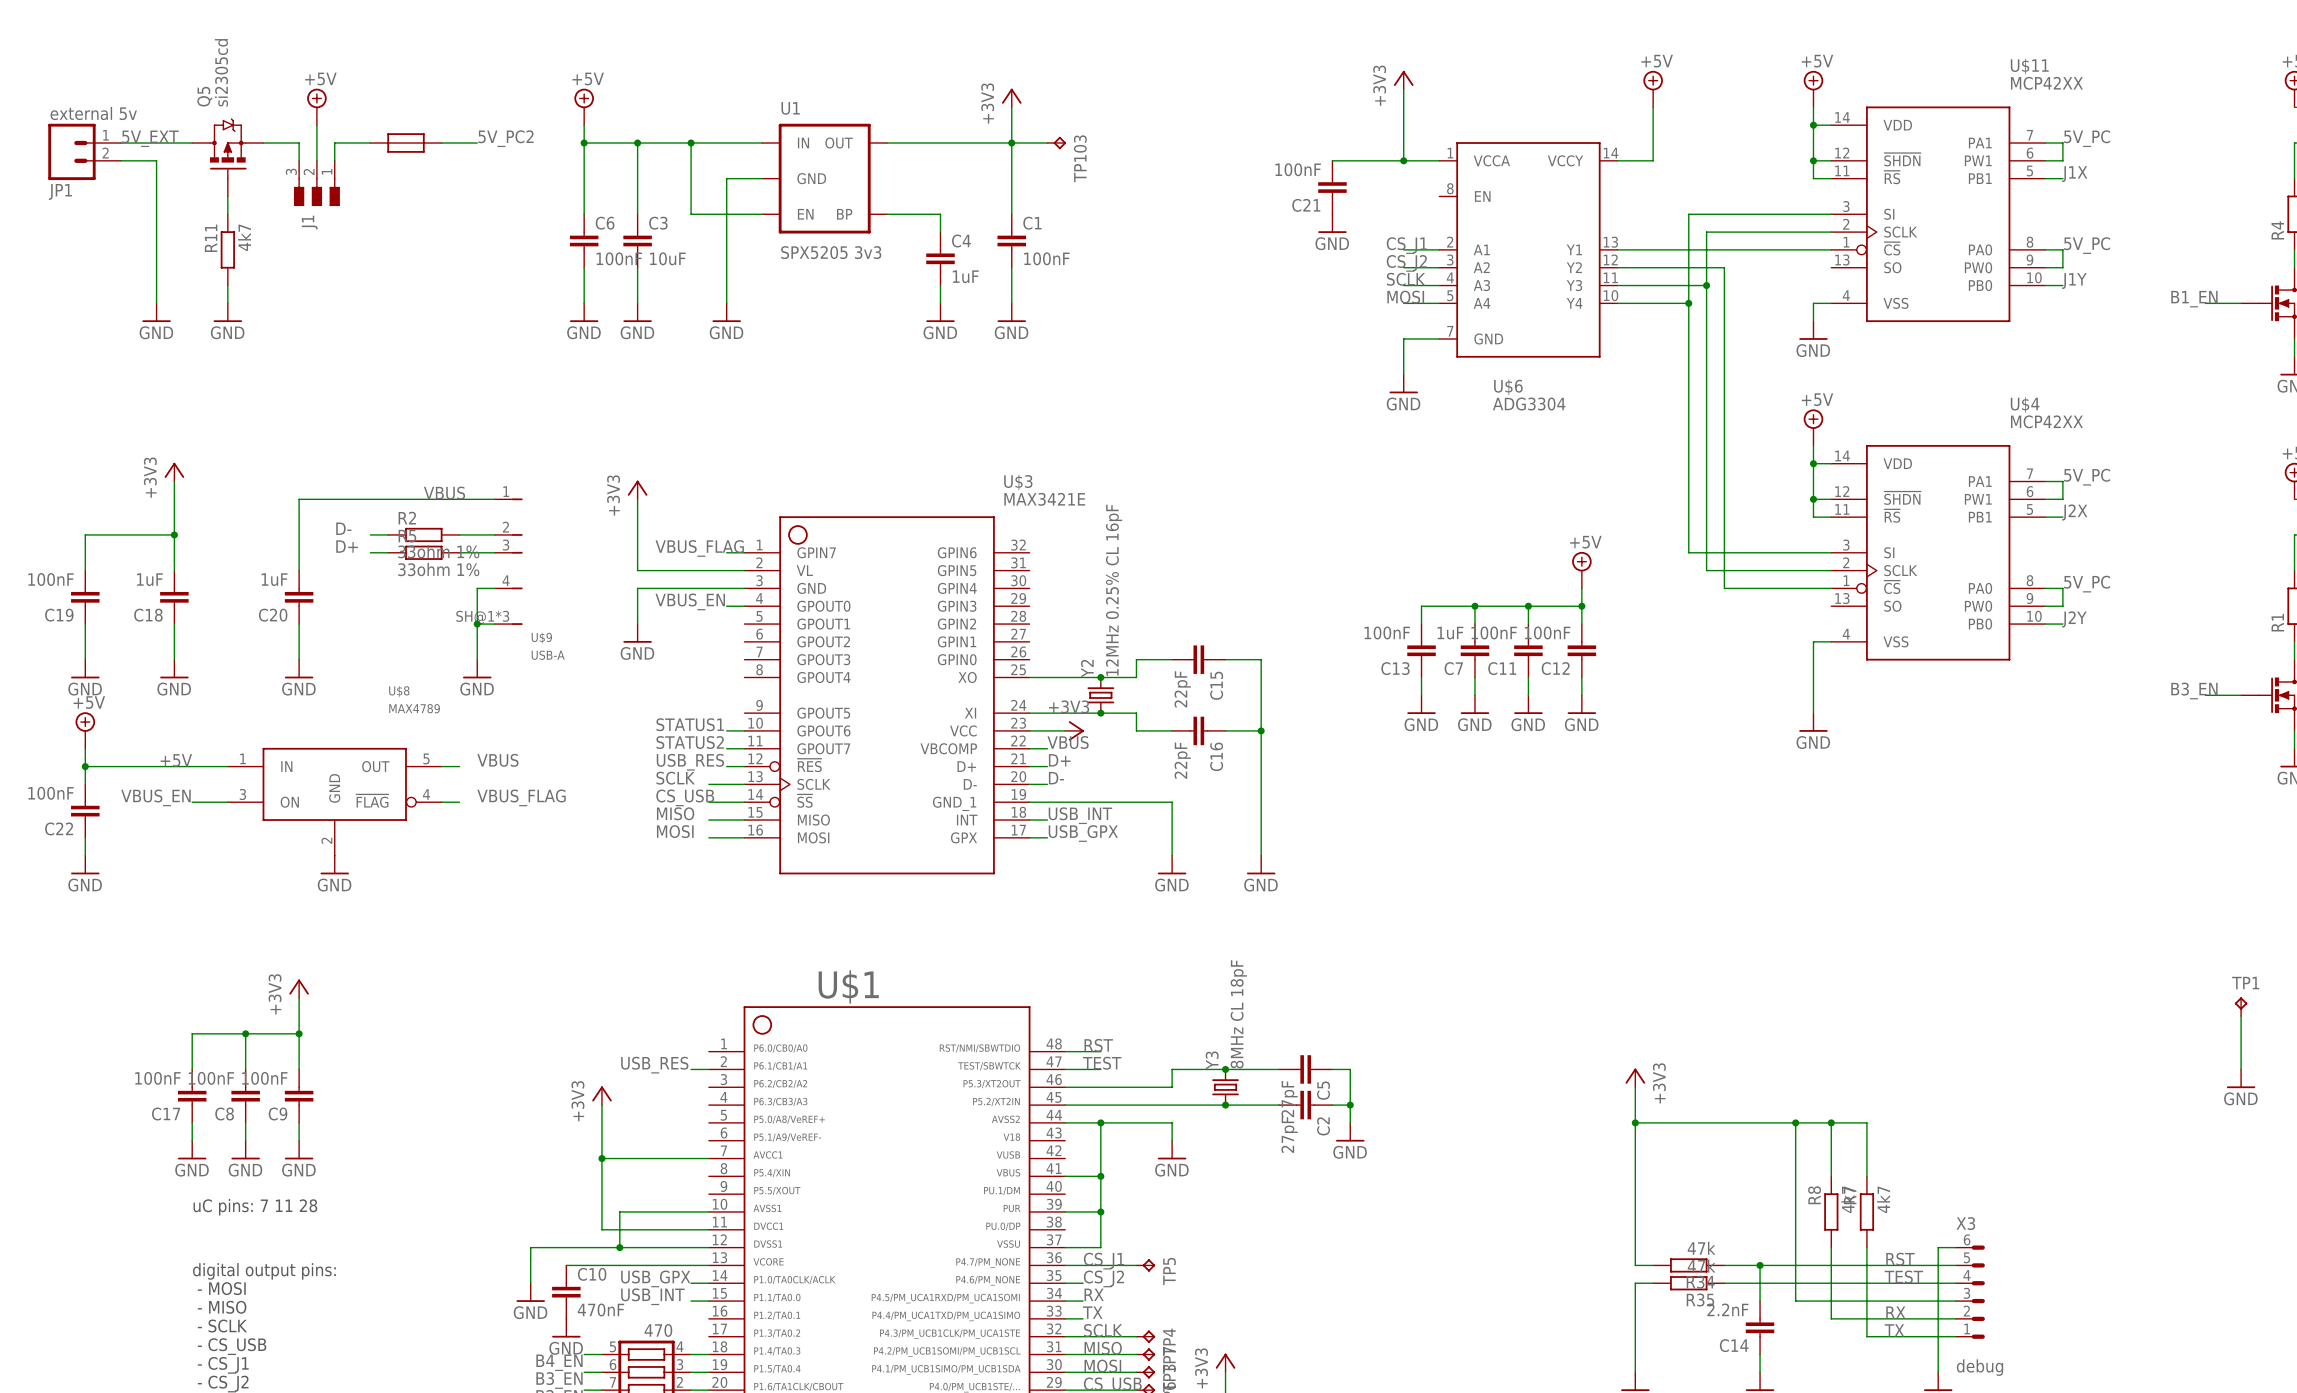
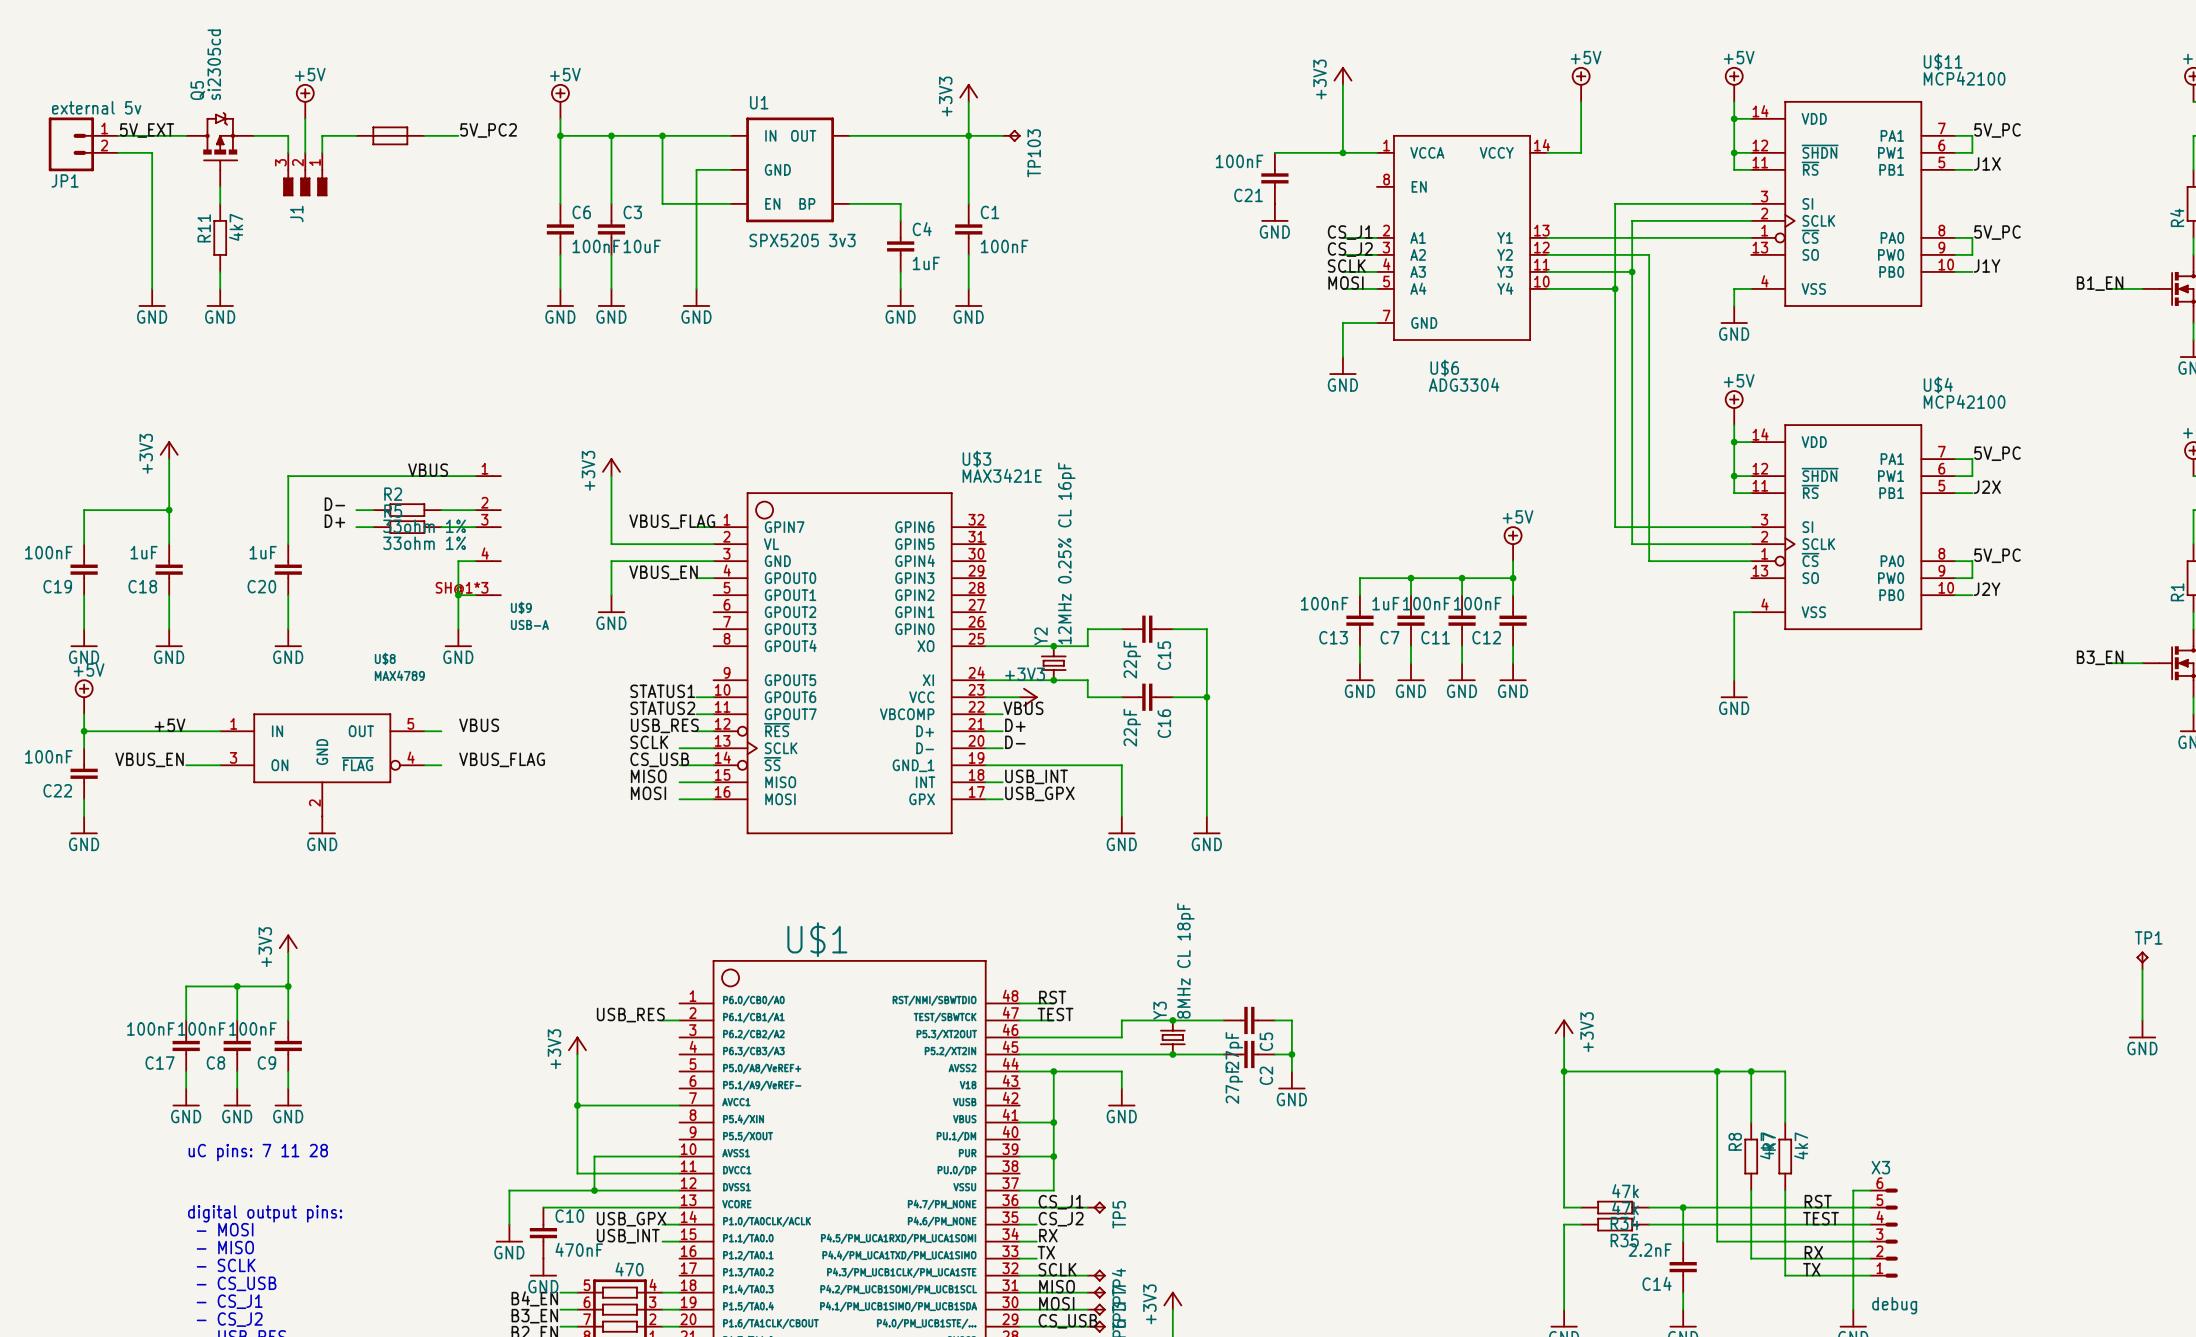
U$11 value: MCP42XX (2046, 83) -> MCP42100 (1964, 78)
U$4 value: MCP42XX (2046, 421) -> MCP42100 (1964, 401)

